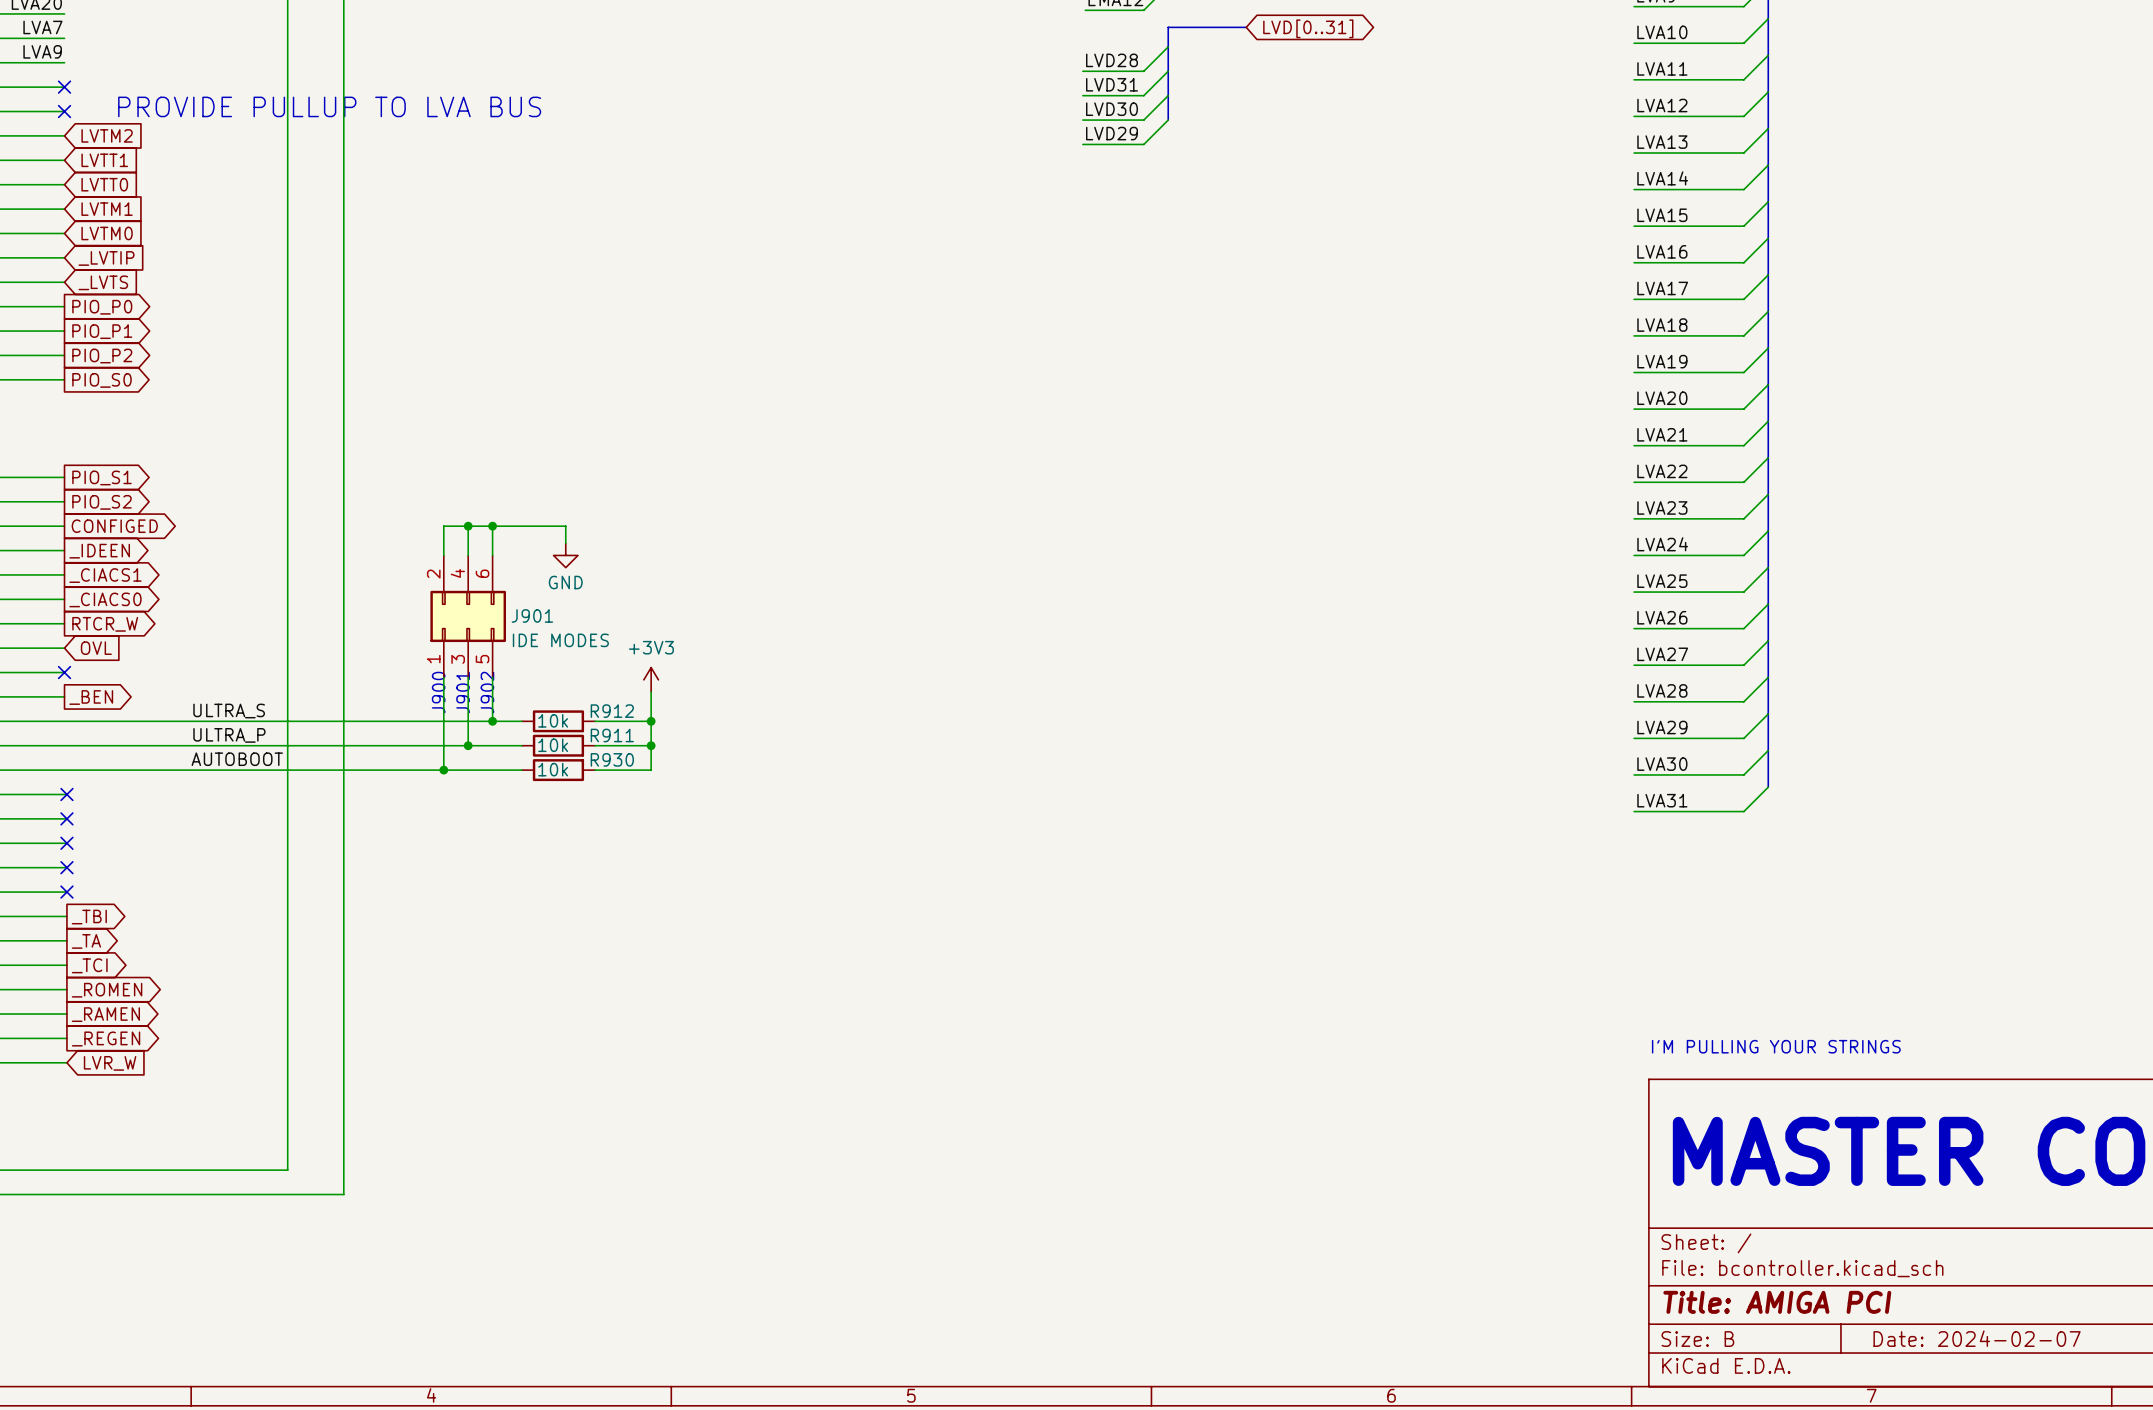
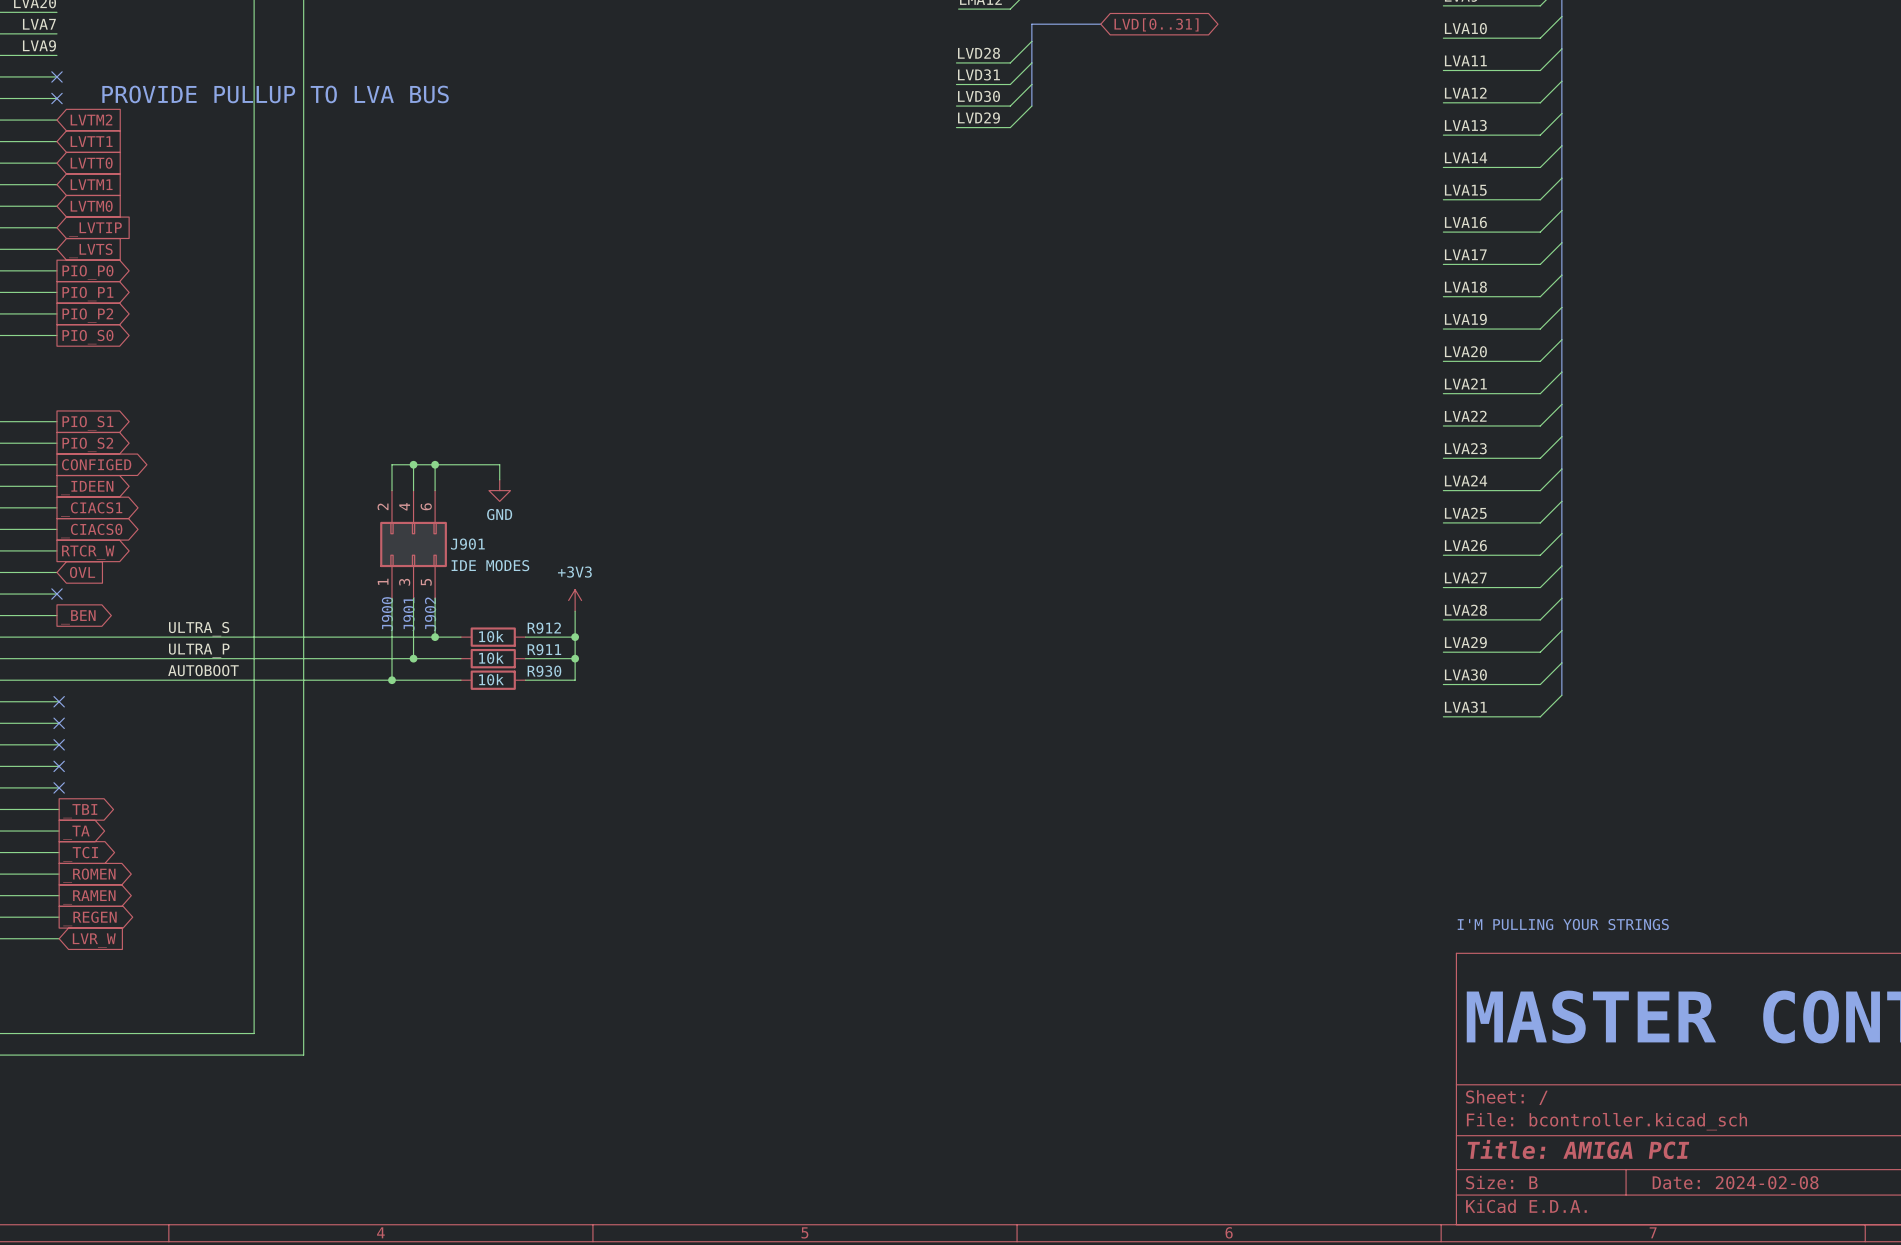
title block: Date: 2024-02-07 (1977, 1338) -> Date: 2024-02-08 (1735, 1182)

